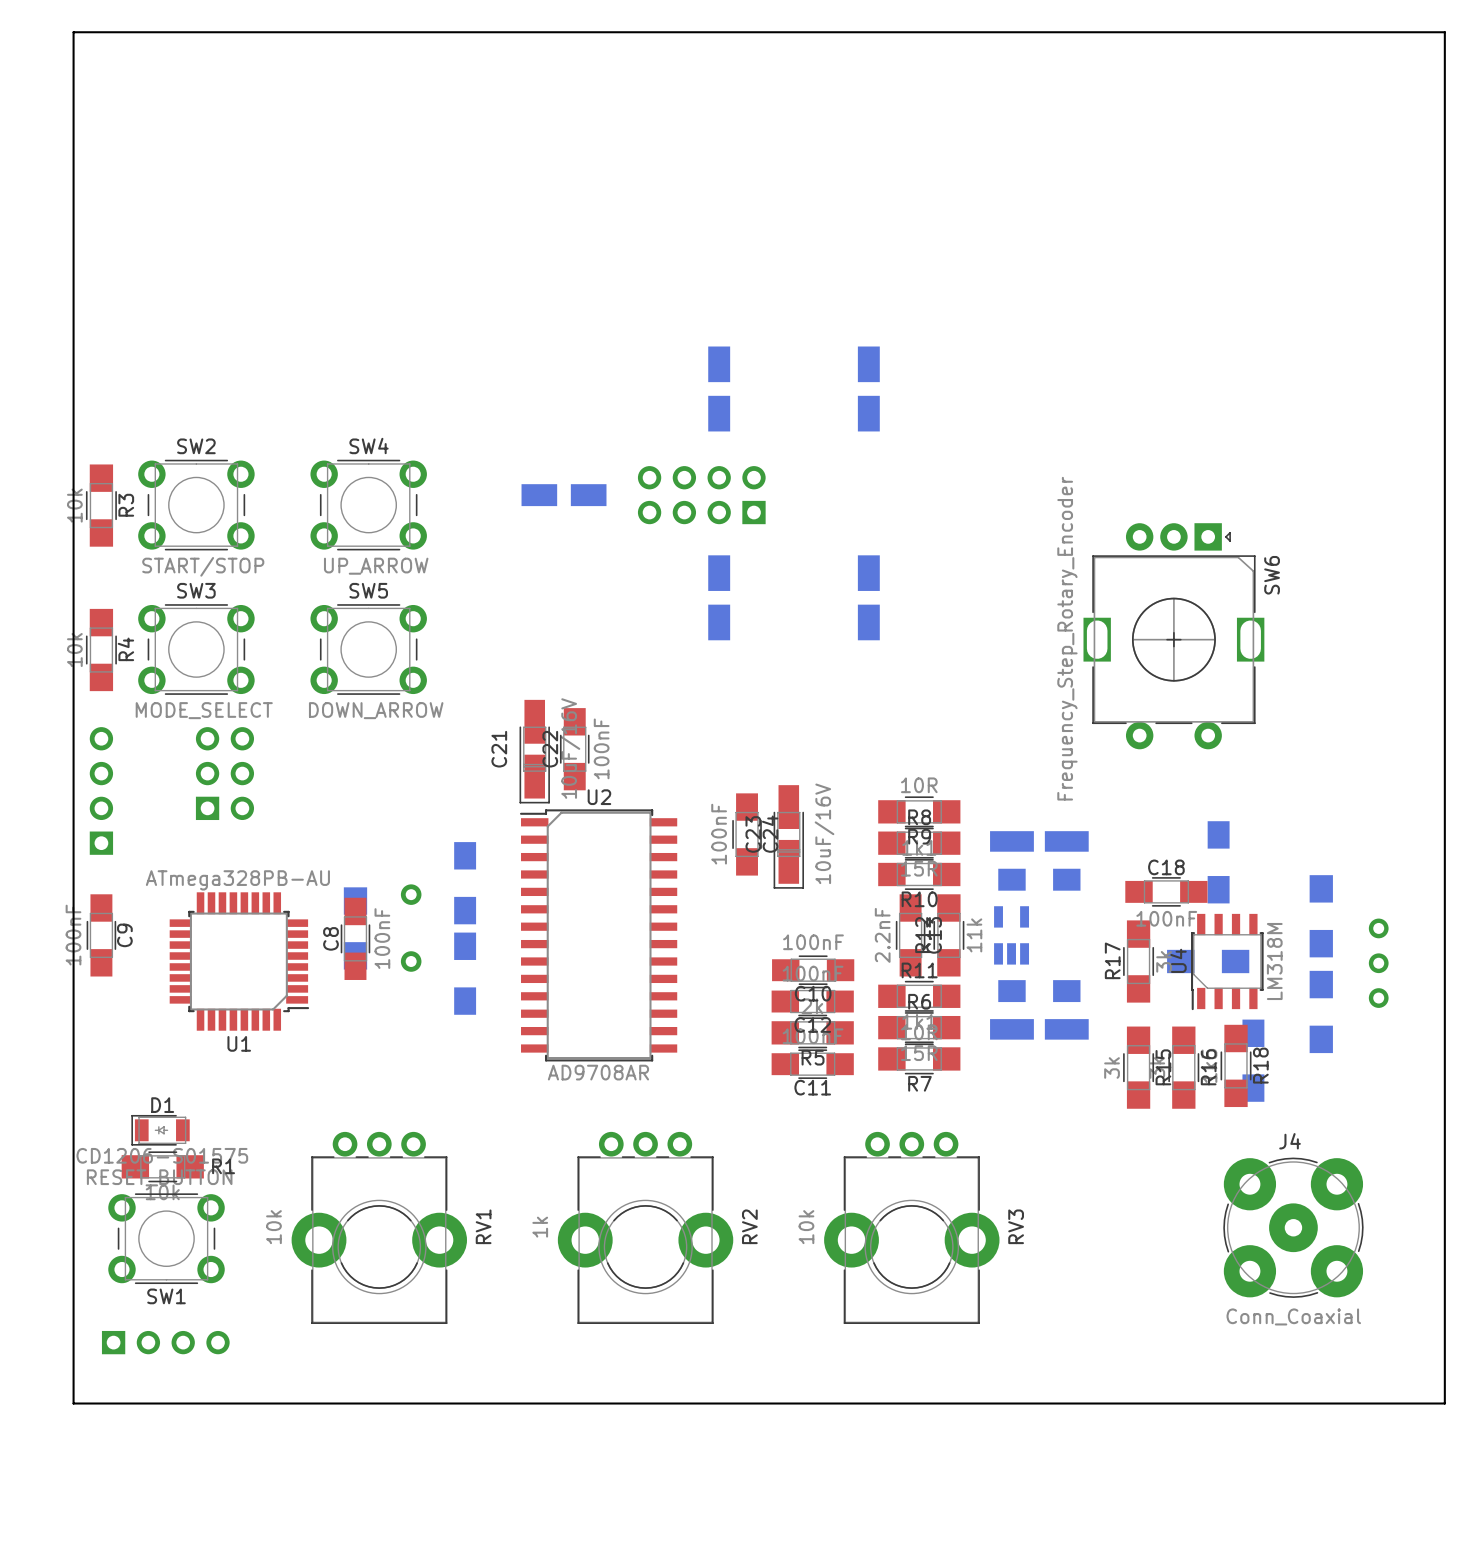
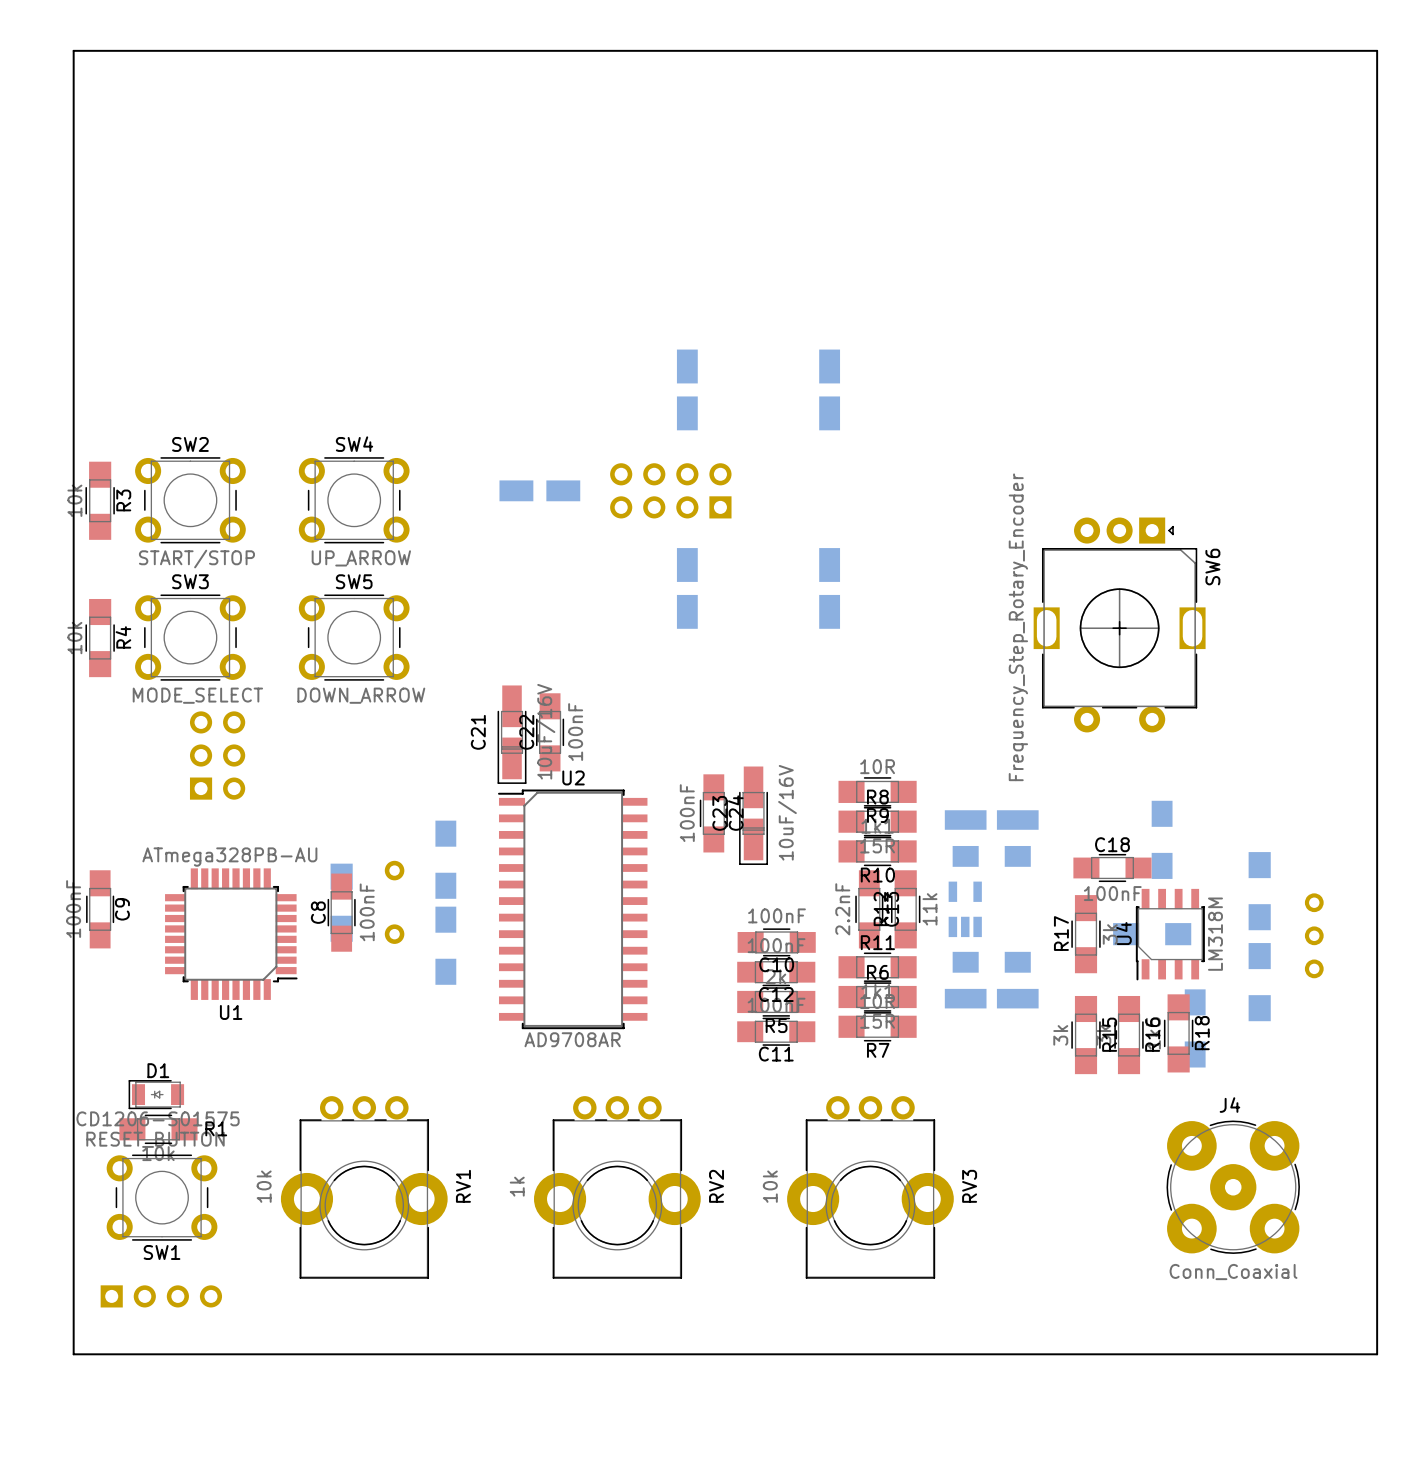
part: (101, 790) -> none

